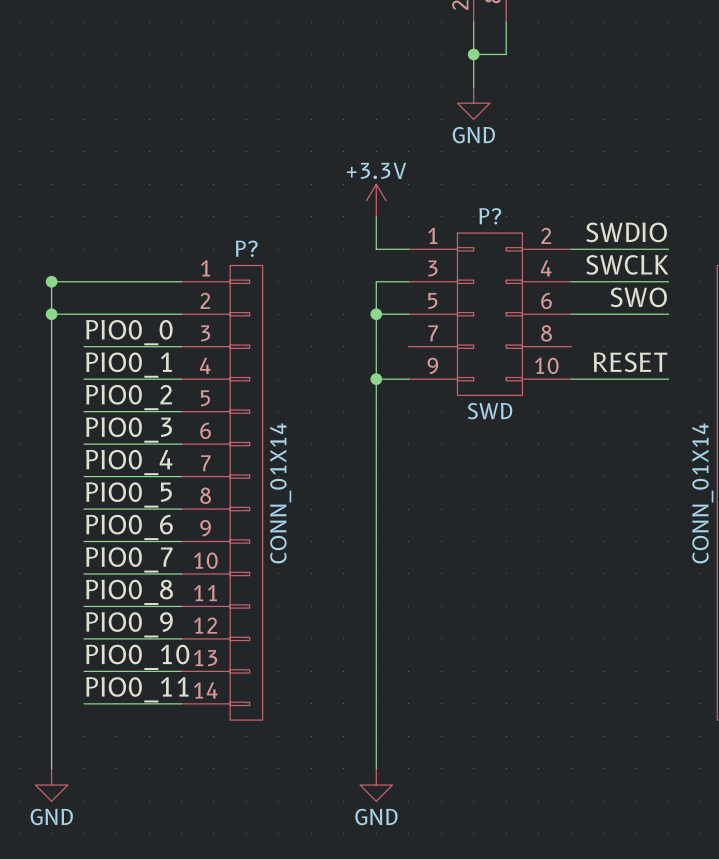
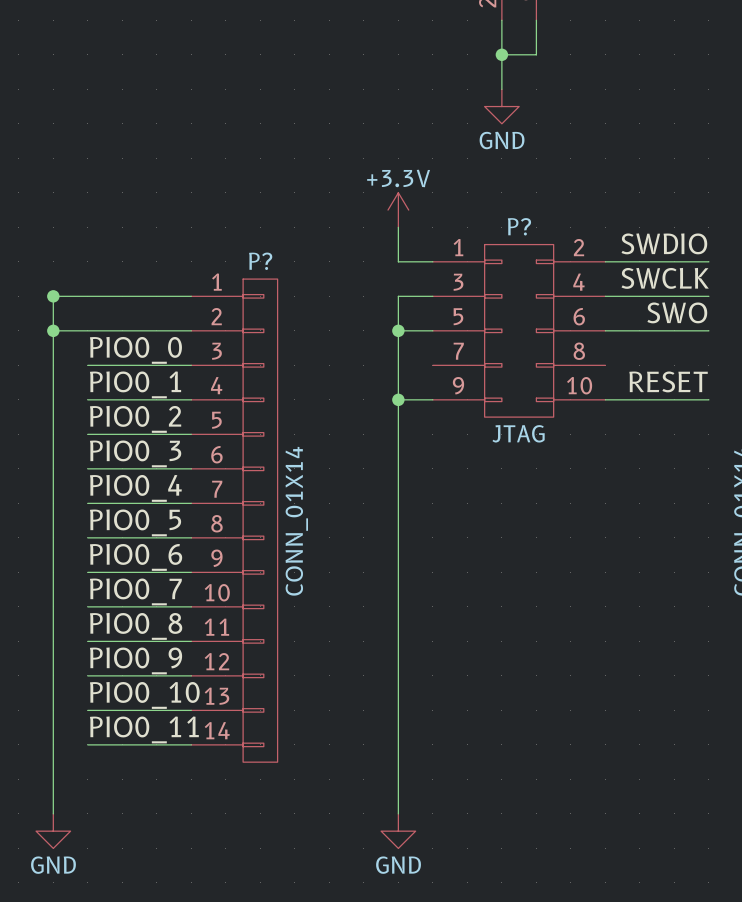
P? value: SWD (490, 411) -> JTAG (518, 433)

